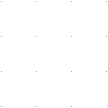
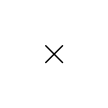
no-connect mark: none -> (54, 54)

